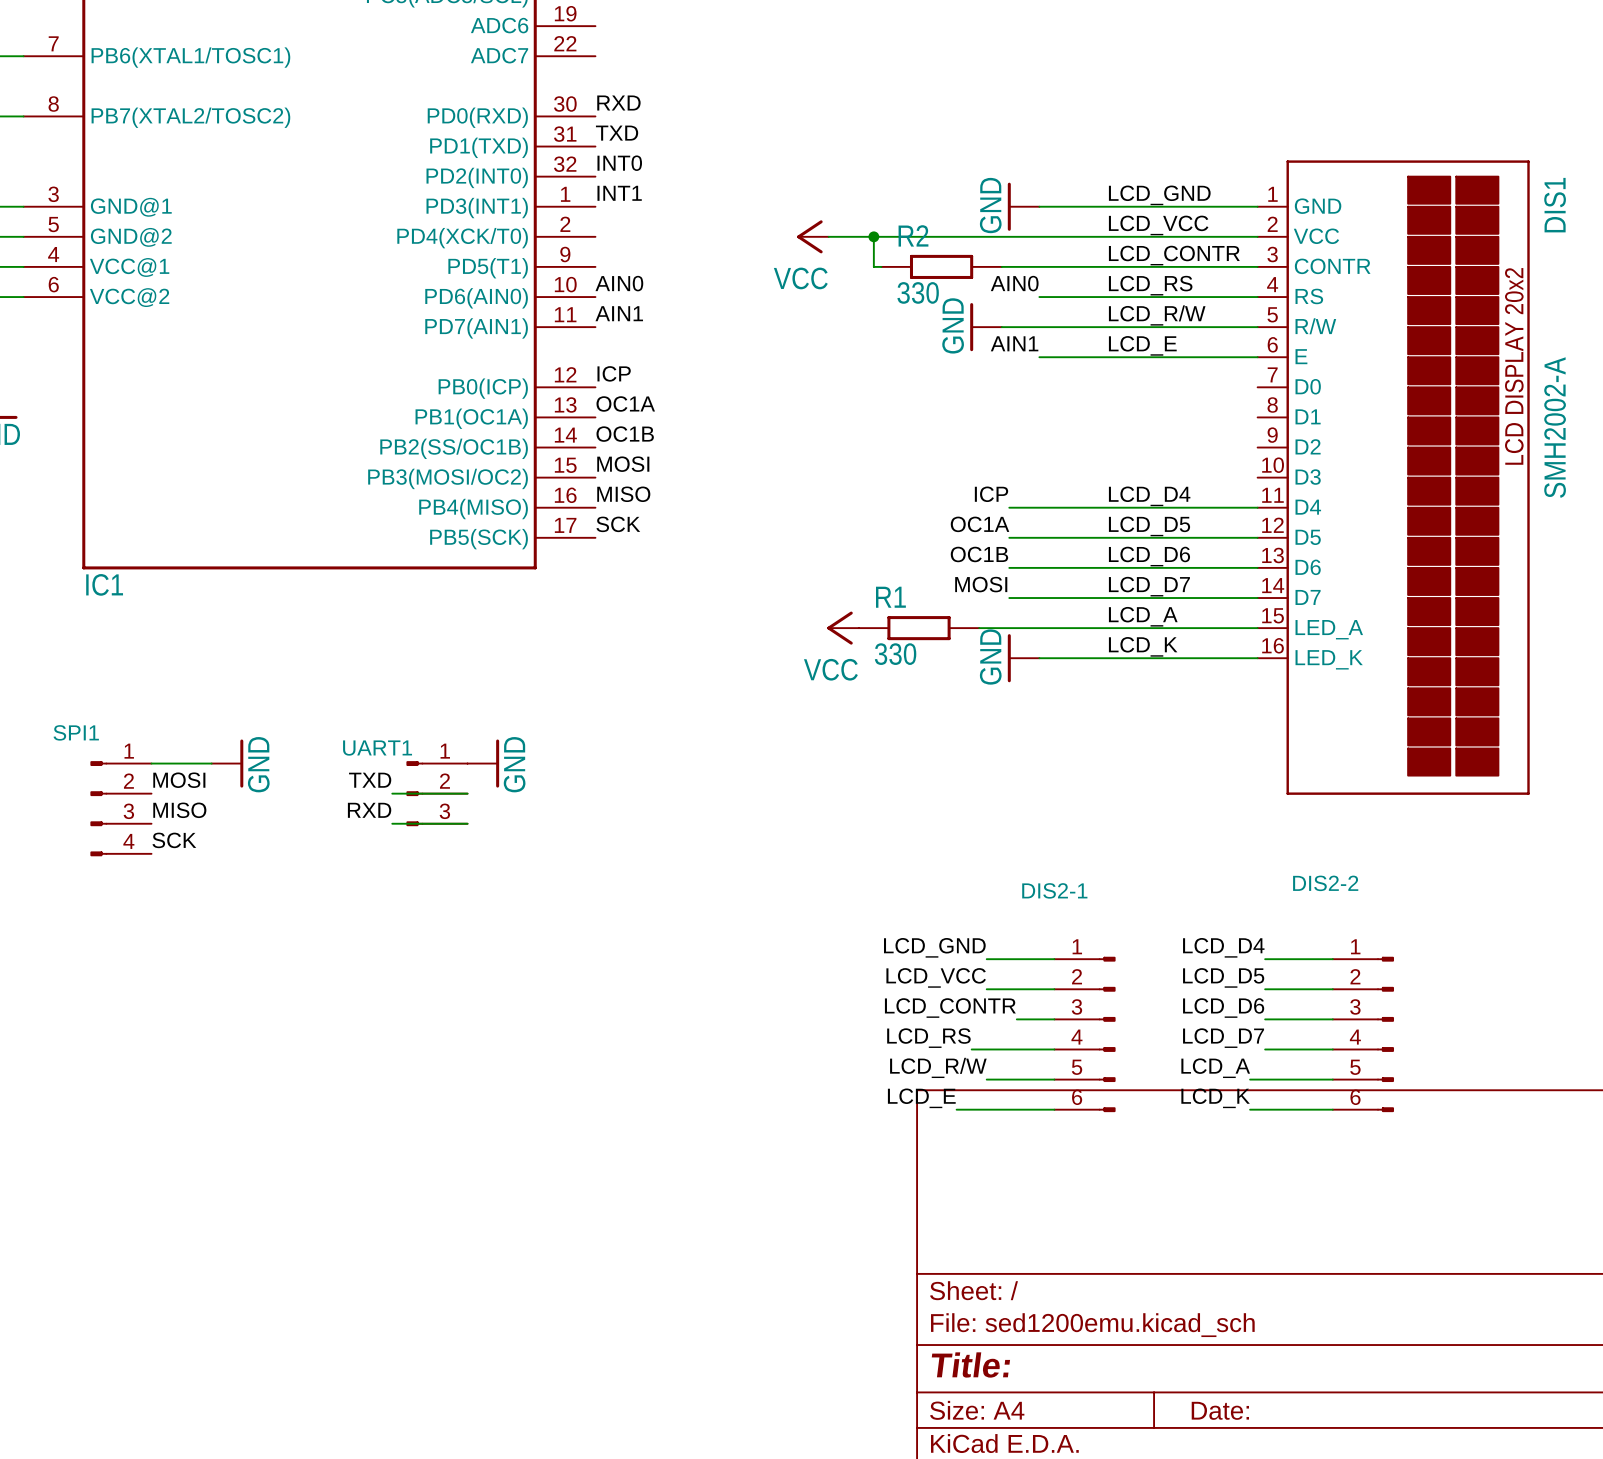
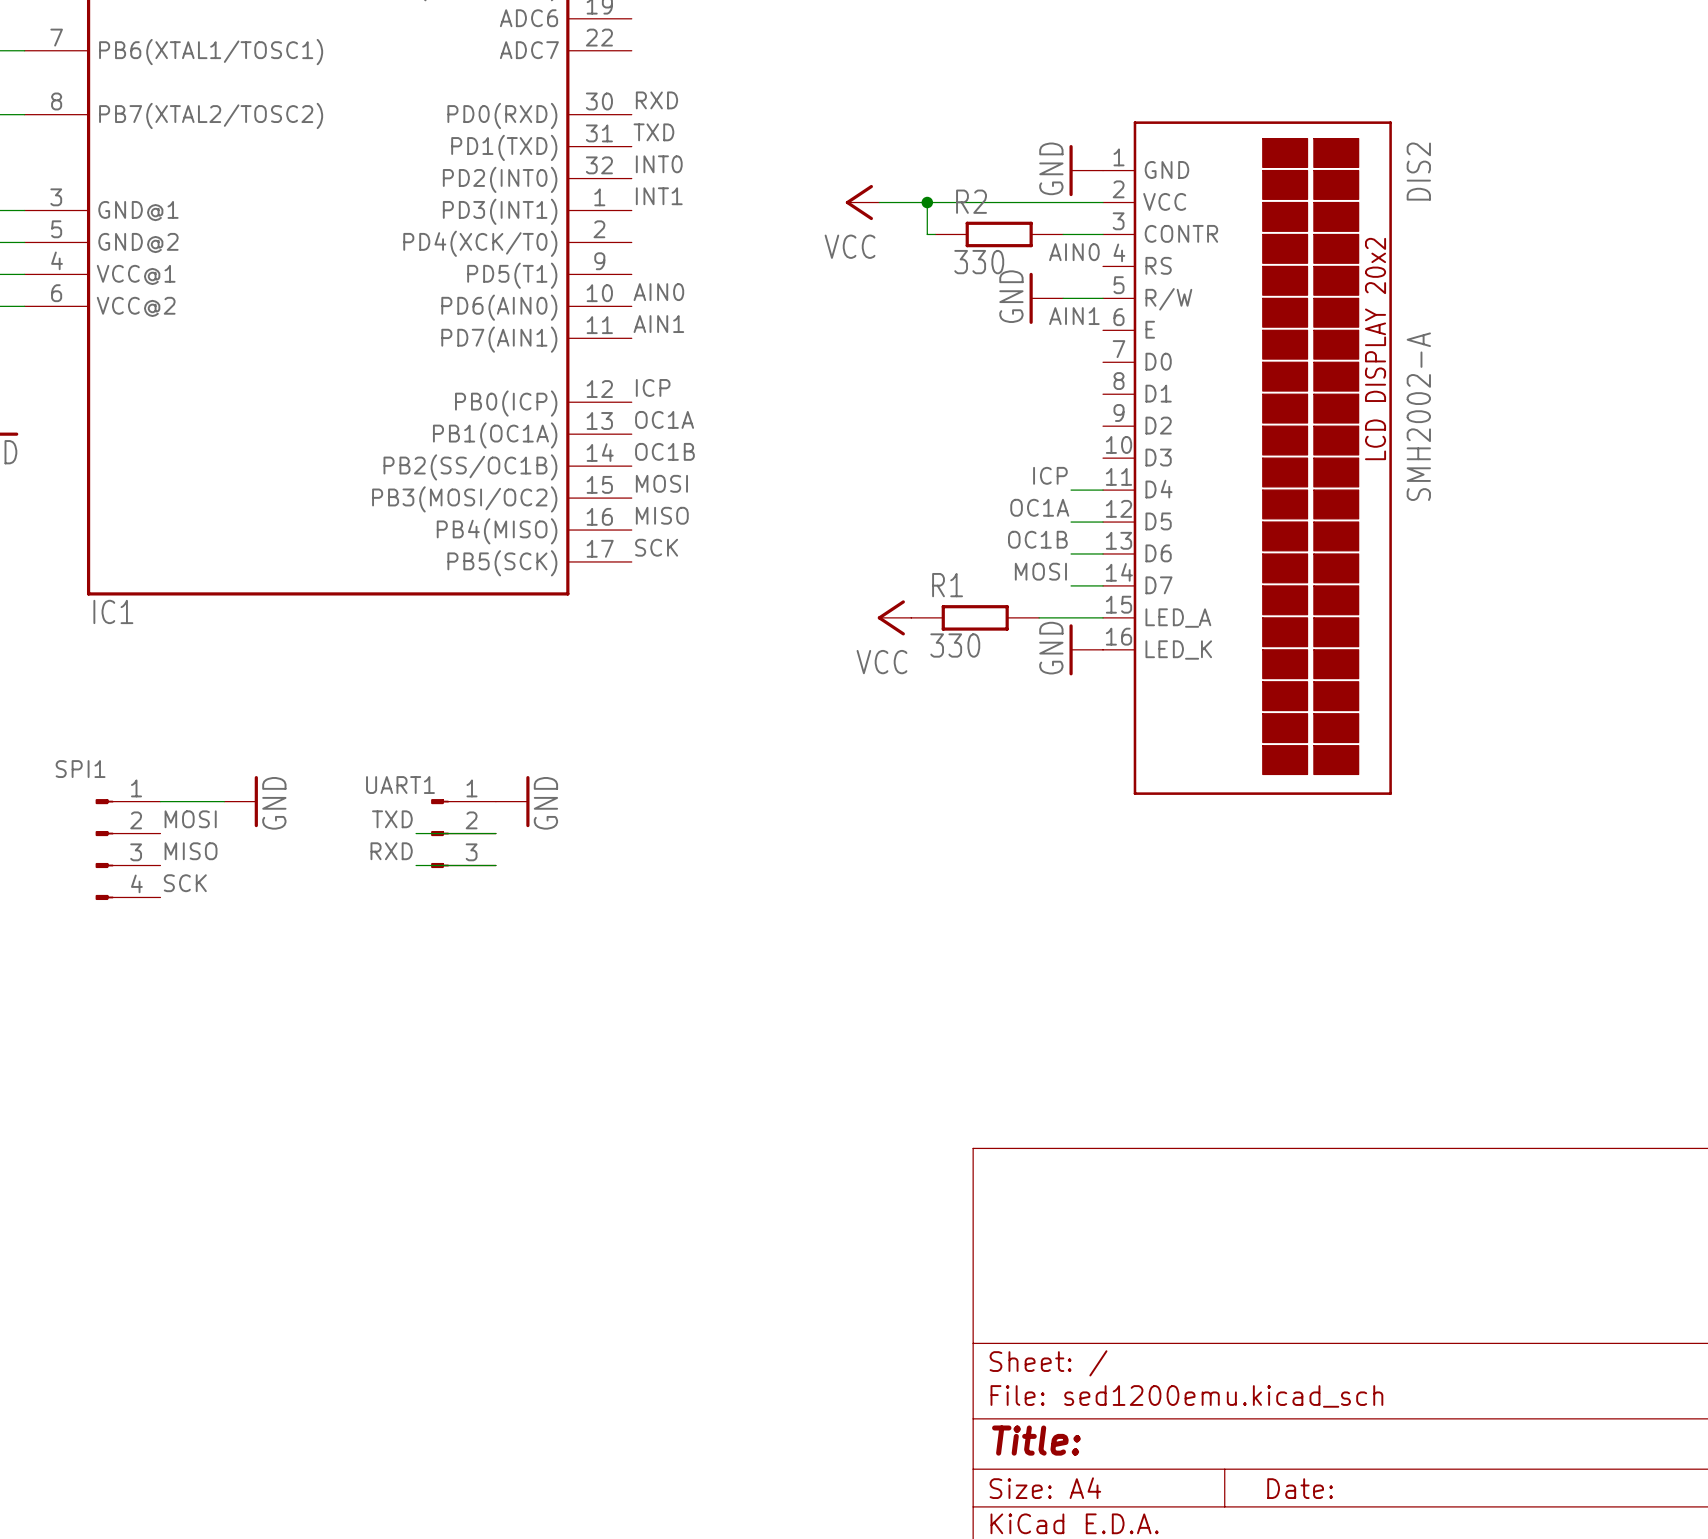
label: LCD_GND (1159, 195) -> none
wire: none -> (879, 202) (1103, 202)
power symbol position: GND (1023, 206) -> GND (1086, 170)
wire: (1039, 206) (1257, 206) -> none
label: LCD_VCC (1158, 225) -> none
wire: none -> (1063, 234) (1103, 234)
power symbol position: VCC (812, 236) -> VCC (862, 202)
wire: (828, 236) (1257, 236) -> none
wire: (873, 236) (873, 266) (881, 266) -> (927, 202) (927, 234) (935, 234)
junction position: (873, 236) -> (927, 202)
label: LCD_CONTR (1174, 255) -> none
R2 position: (941, 266) -> (999, 234)
wire: (1001, 266) (1257, 266) -> none
label position: AIN0 (1014, 283) -> AIN0 (1074, 252)
label: LCD_RS (1150, 285) -> none
wire: none -> (1063, 298) (1103, 298)
wire: (1039, 297) (1257, 297) -> none
label: LCD_R/W (1157, 315) -> none
power symbol position: GND (985, 327) -> GND (1046, 298)
wire: (1001, 327) (1257, 327) -> none
label position: AIN1 (1014, 343) -> AIN1 (1074, 316)
label: LCD_E (1142, 345) -> none
wire: (1039, 357) (1257, 357) -> none
DIS2: none -> SMH2002-A (1247, 458)
wire: none -> (1071, 490) (1103, 490)
DIS1: SMH2002-A (1393, 477) -> none
label position: ICP (991, 494) -> ICP (1050, 475)
label: LCD_D4 (1149, 496) -> none
wire: none -> (1071, 522) (1103, 522)
wire: (1009, 507) (1257, 507) -> none
label position: OC1A (980, 524) -> OC1A (1039, 507)
label: LCD_D5 (1149, 526) -> none
wire: none -> (1071, 553) (1103, 553)
wire: (1009, 537) (1257, 537) -> none
label position: OC1B (979, 554) -> OC1B (1037, 539)
label: LCD_D6 (1149, 556) -> none
wire: none -> (1071, 585) (1103, 585)
wire: (1009, 567) (1257, 567) -> none
label position: MOSI (981, 584) -> MOSI (1040, 571)
label: LCD_D7 (1149, 586) -> none
wire: none -> (1039, 617) (1103, 617)
wire: (1009, 598) (1257, 598) -> none
label: LCD_A (1143, 616) -> none
power symbol position: VCC (843, 628) -> VCC (894, 617)
R1 position: (919, 628) -> (975, 617)
wire: (979, 628) (1257, 628) -> none
label: LCD_K (1143, 646) -> none
power symbol position: GND (1023, 658) -> GND (1086, 649)
wire: (1039, 658) (1257, 658) -> none
label: LCD_GND (934, 947) -> none
label: LCD_D4 (1223, 947) -> none
wire: (986, 959) (1054, 959) -> none
wire: (1265, 959) (1332, 959) -> none
label: LCD_VCC (936, 977) -> none
label: LCD_D5 (1223, 977) -> none
wire: (986, 989) (1054, 989) -> none
wire: (1265, 989) (1332, 989) -> none
label: LCD_CONTR (950, 1008) -> none
label: LCD_D6 (1223, 1008) -> none
wire: (1016, 1019) (1054, 1019) -> none
wire: (1265, 1019) (1332, 1019) -> none
DIS2-1: (1085, 1034) -> none
DIS2-2: (1363, 1034) -> none
label: LCD_RS (928, 1038) -> none
label: LCD_D7 (1223, 1038) -> none
wire: (971, 1049) (1054, 1049) -> none
wire: (1265, 1049) (1332, 1049) -> none
label: LCD_R/W (938, 1067) -> none
label: LCD_A (1215, 1068) -> none
wire: (986, 1079) (1054, 1079) -> none
wire: (1250, 1079) (1332, 1079) -> none
label: LCD_E (921, 1098) -> none
label: LCD_K (1215, 1098) -> none
wire: (956, 1109) (1054, 1109) -> none
wire: (1250, 1109) (1332, 1109) -> none

